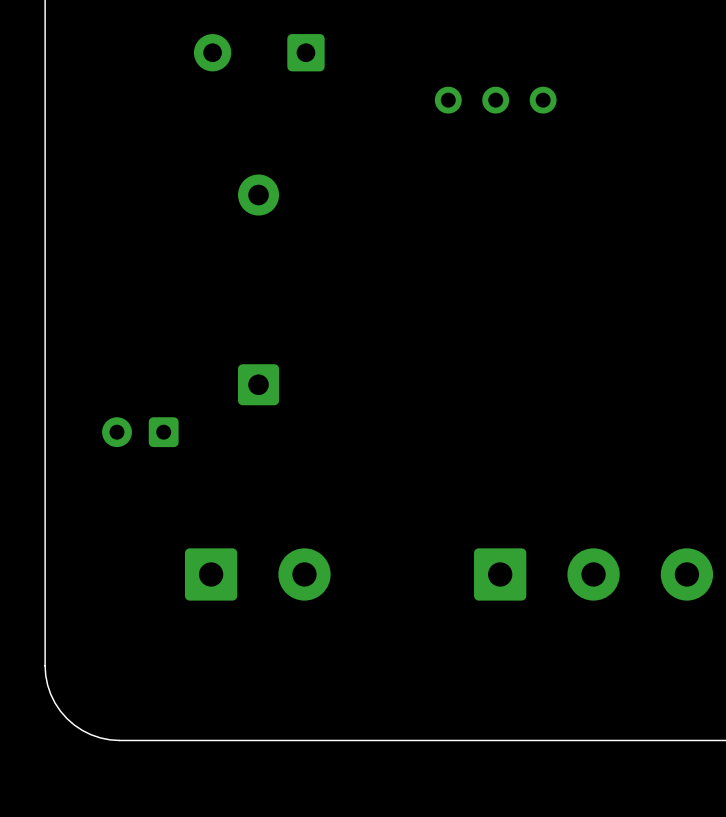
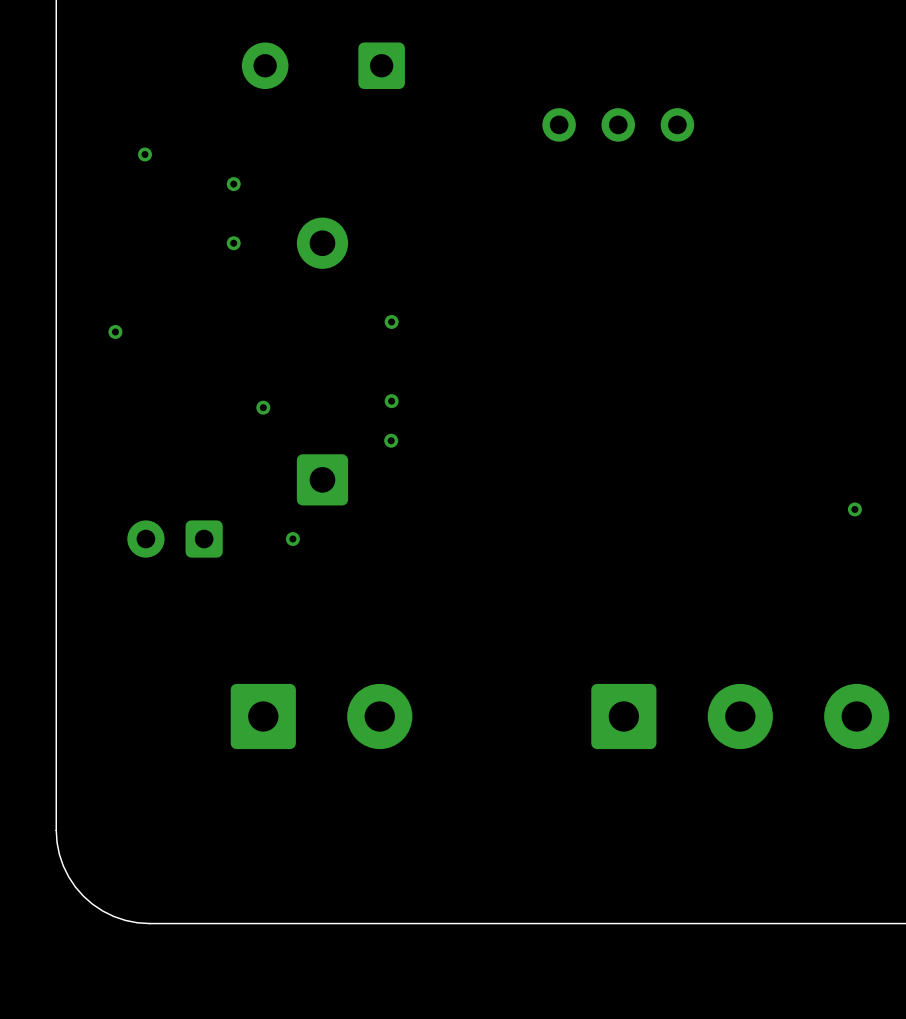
via: none -> (144, 154)
via: none -> (233, 184)
via: none -> (233, 243)
via: none -> (391, 321)
via: none -> (115, 331)
via: none -> (391, 401)
via: none -> (263, 407)
via: none -> (391, 440)
via: none -> (854, 509)
via: none -> (292, 539)

